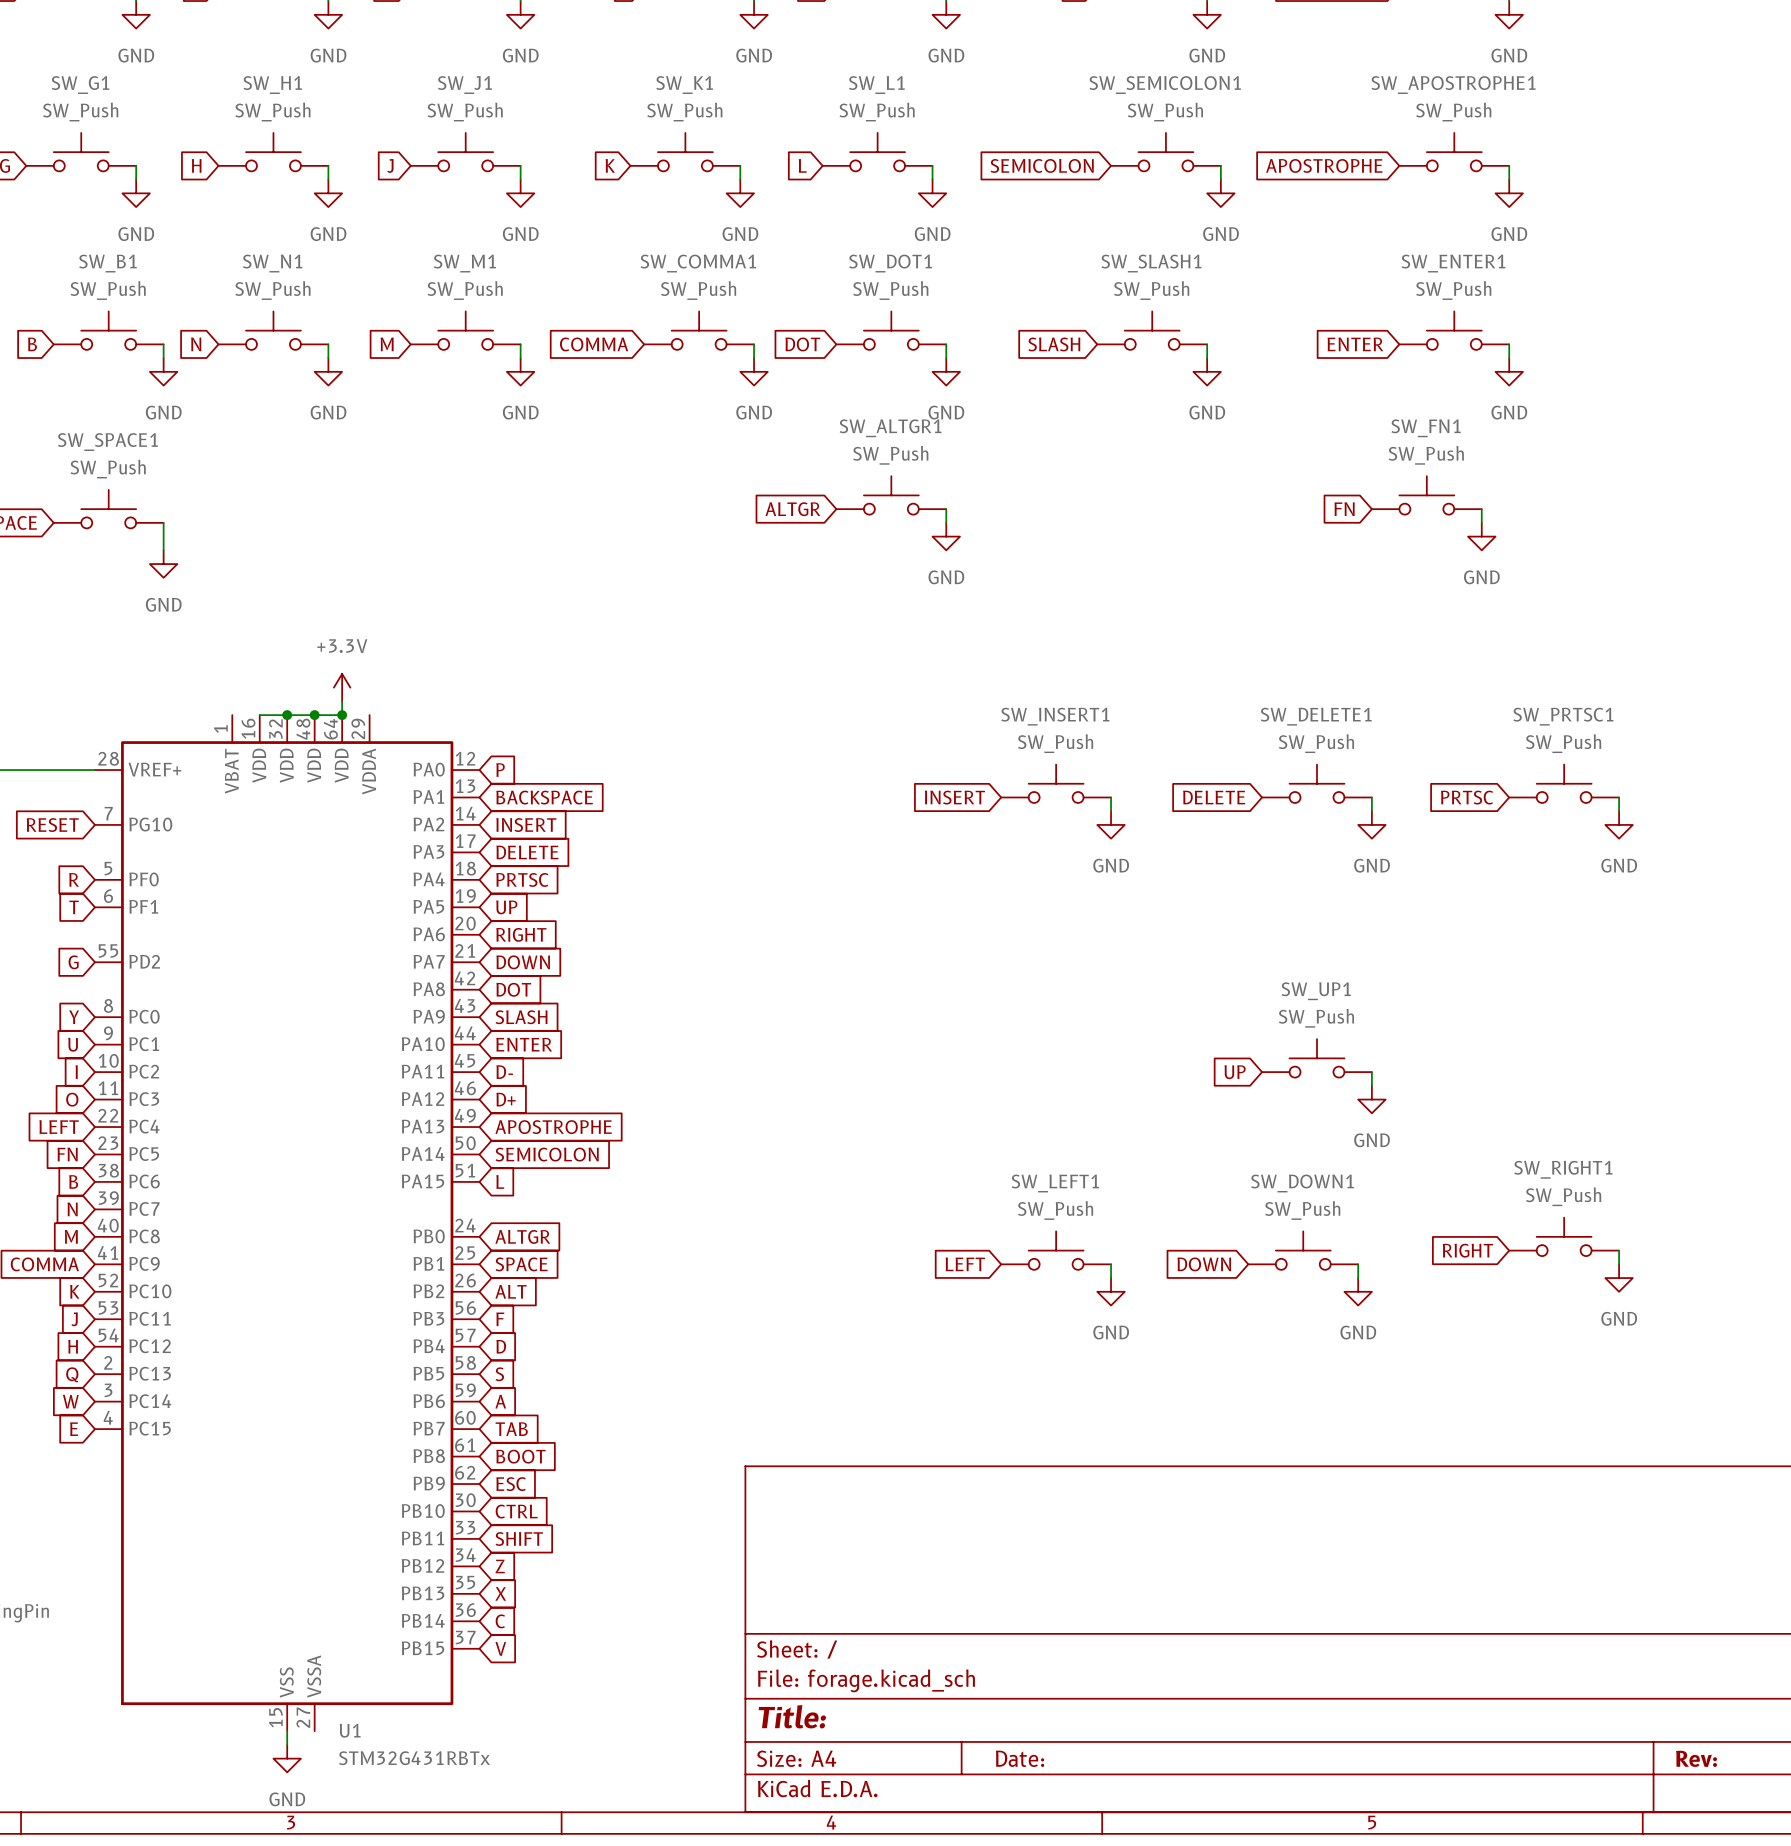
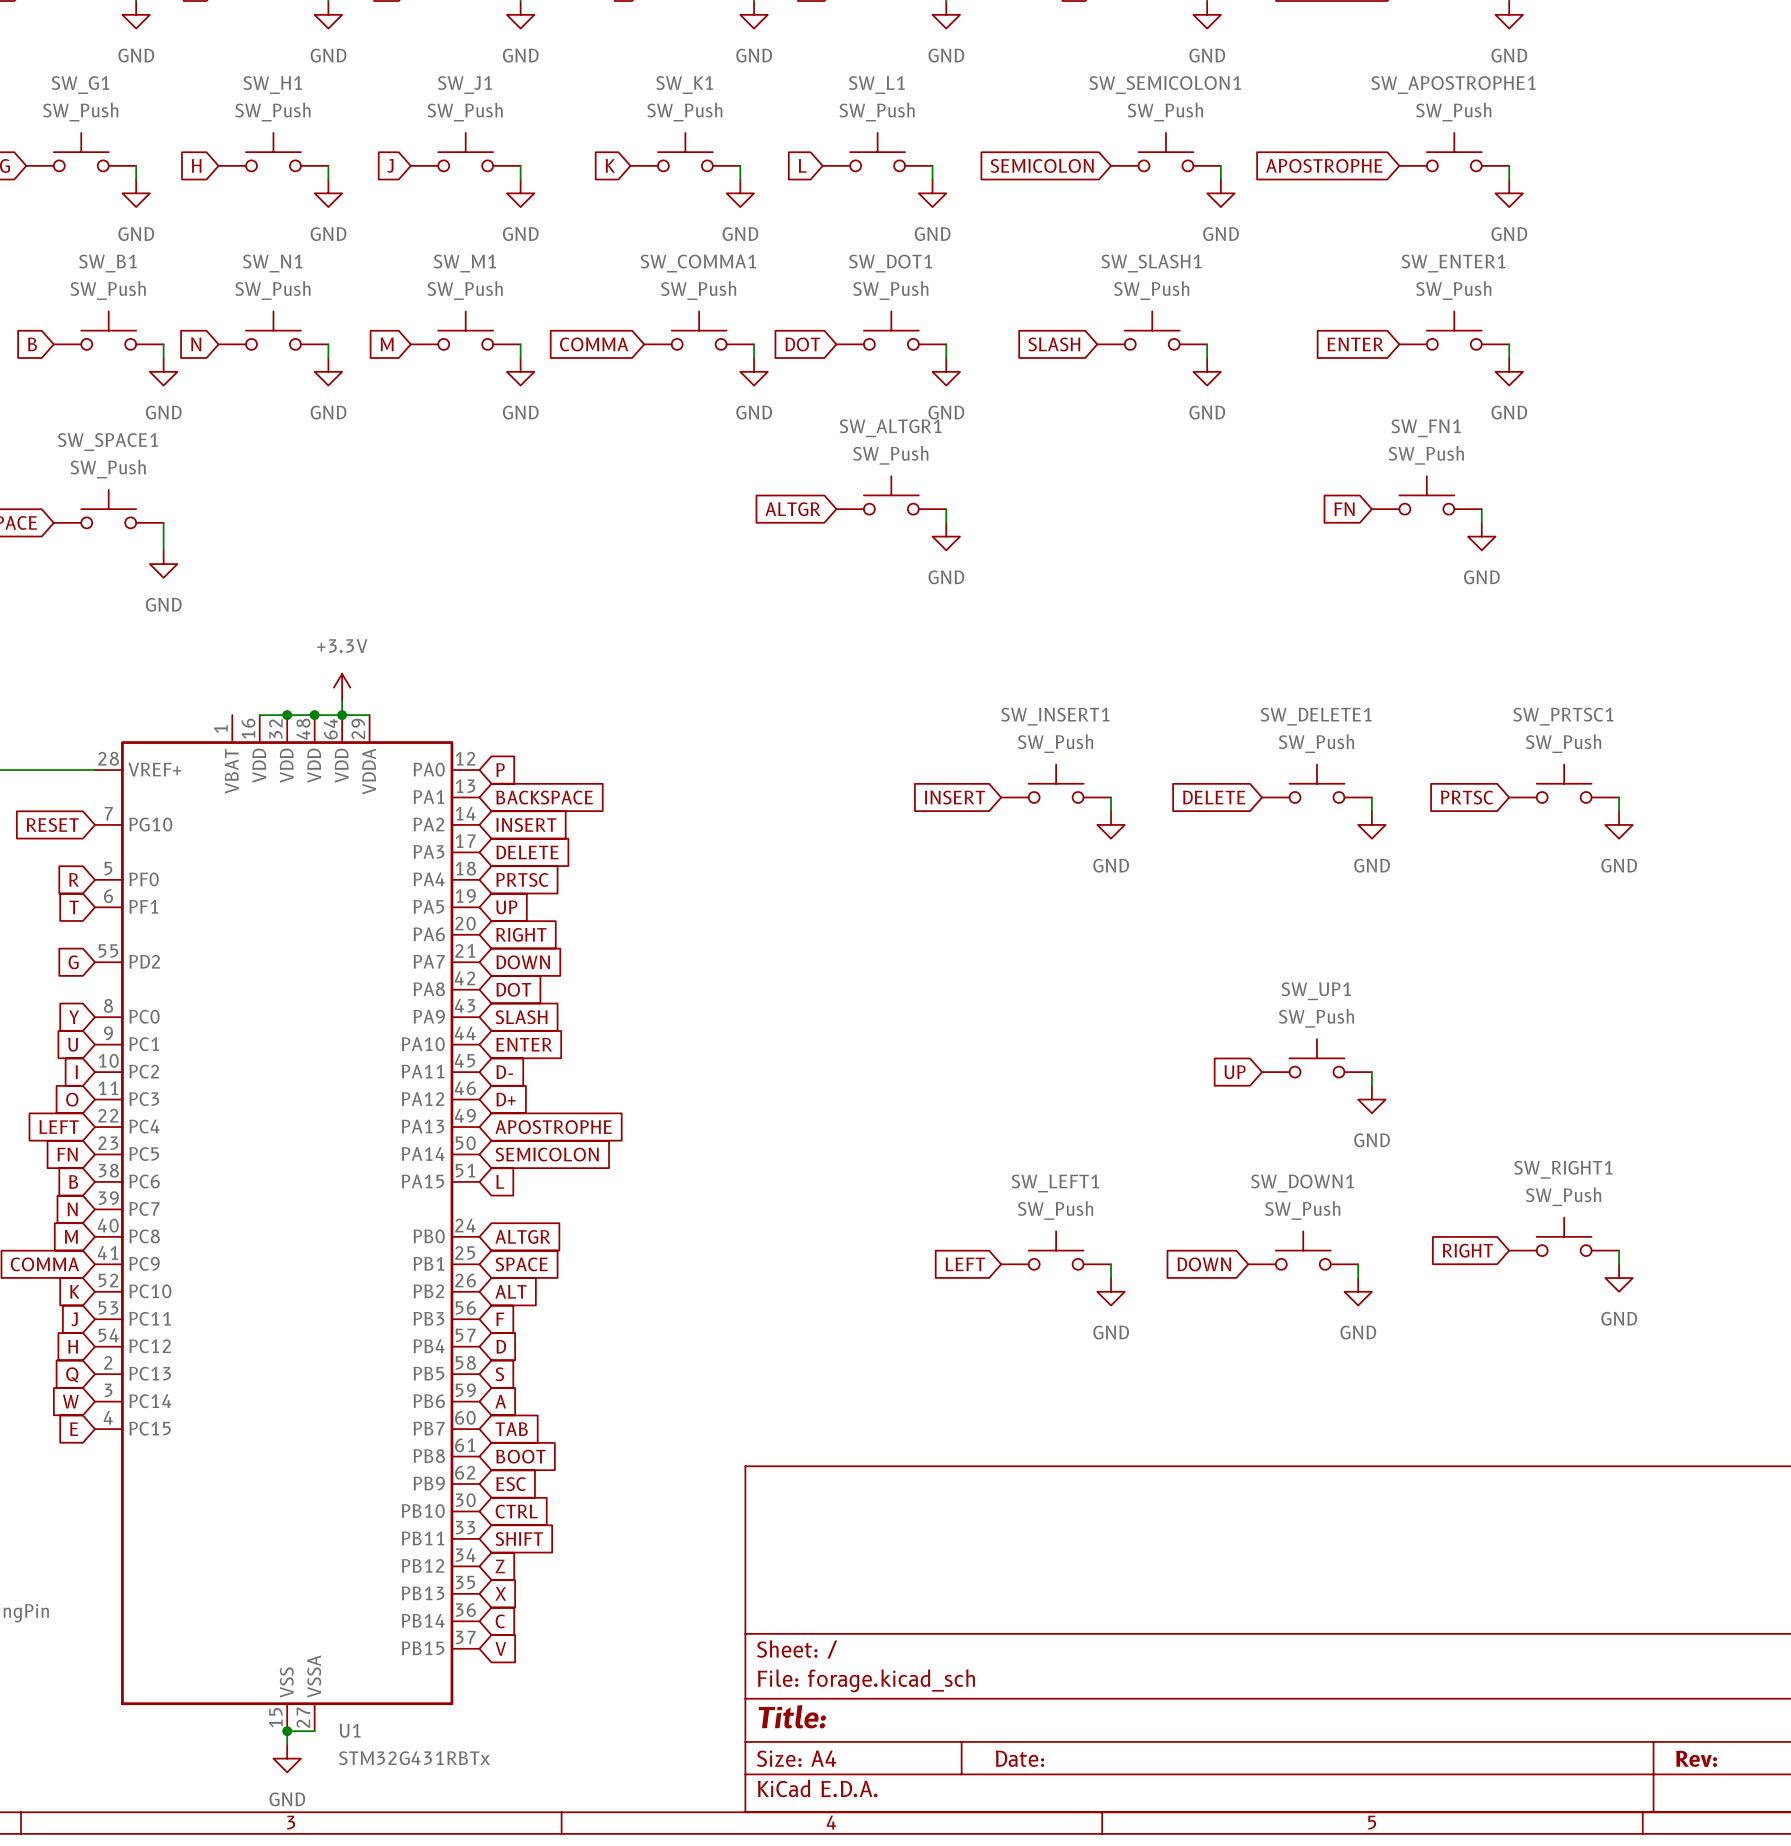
wire: none -> (342, 715) (369, 715)
wire: none -> (287, 1731) (314, 1731)
junction: none -> (287, 1731)

